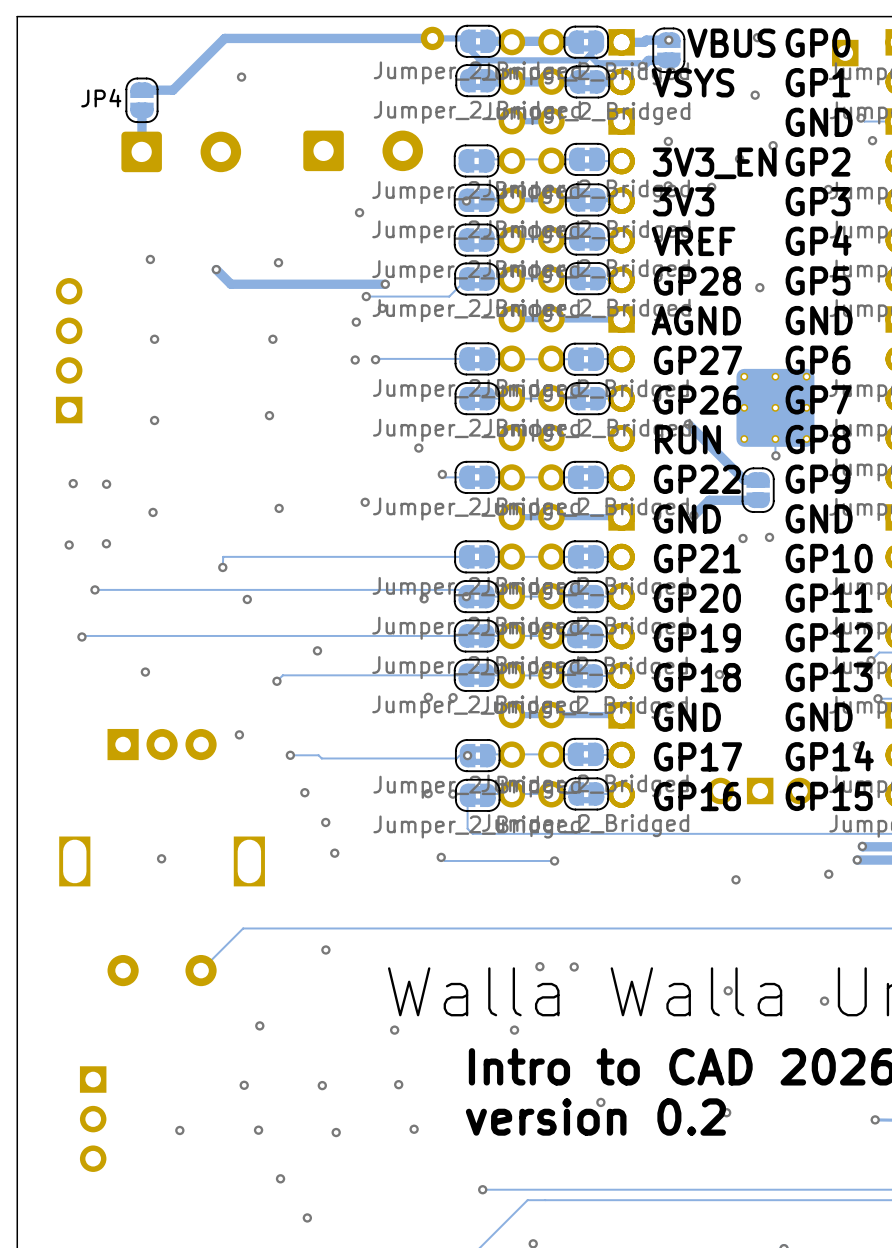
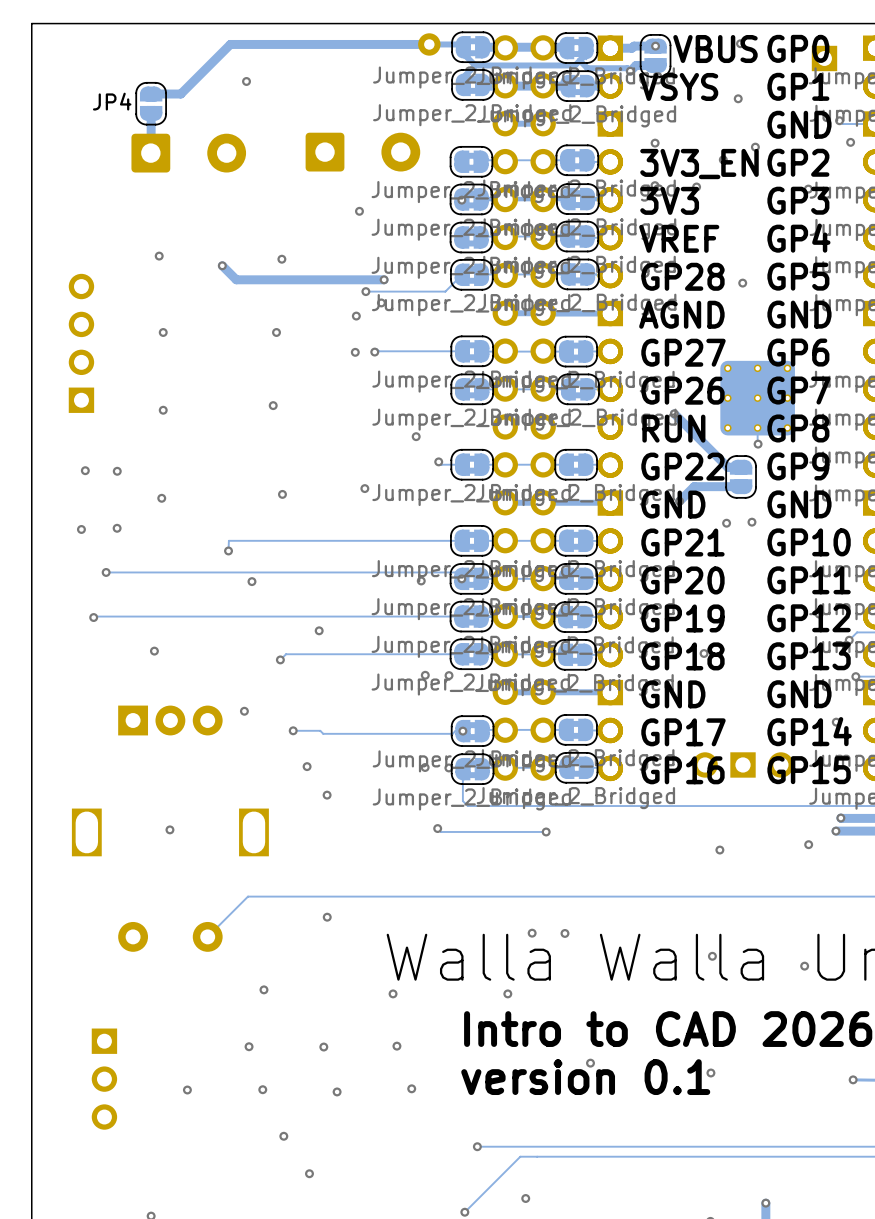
via: (334, 853) -> none
text: version 0.2 (595, 1117) -> version 0.1 (585, 1077)

